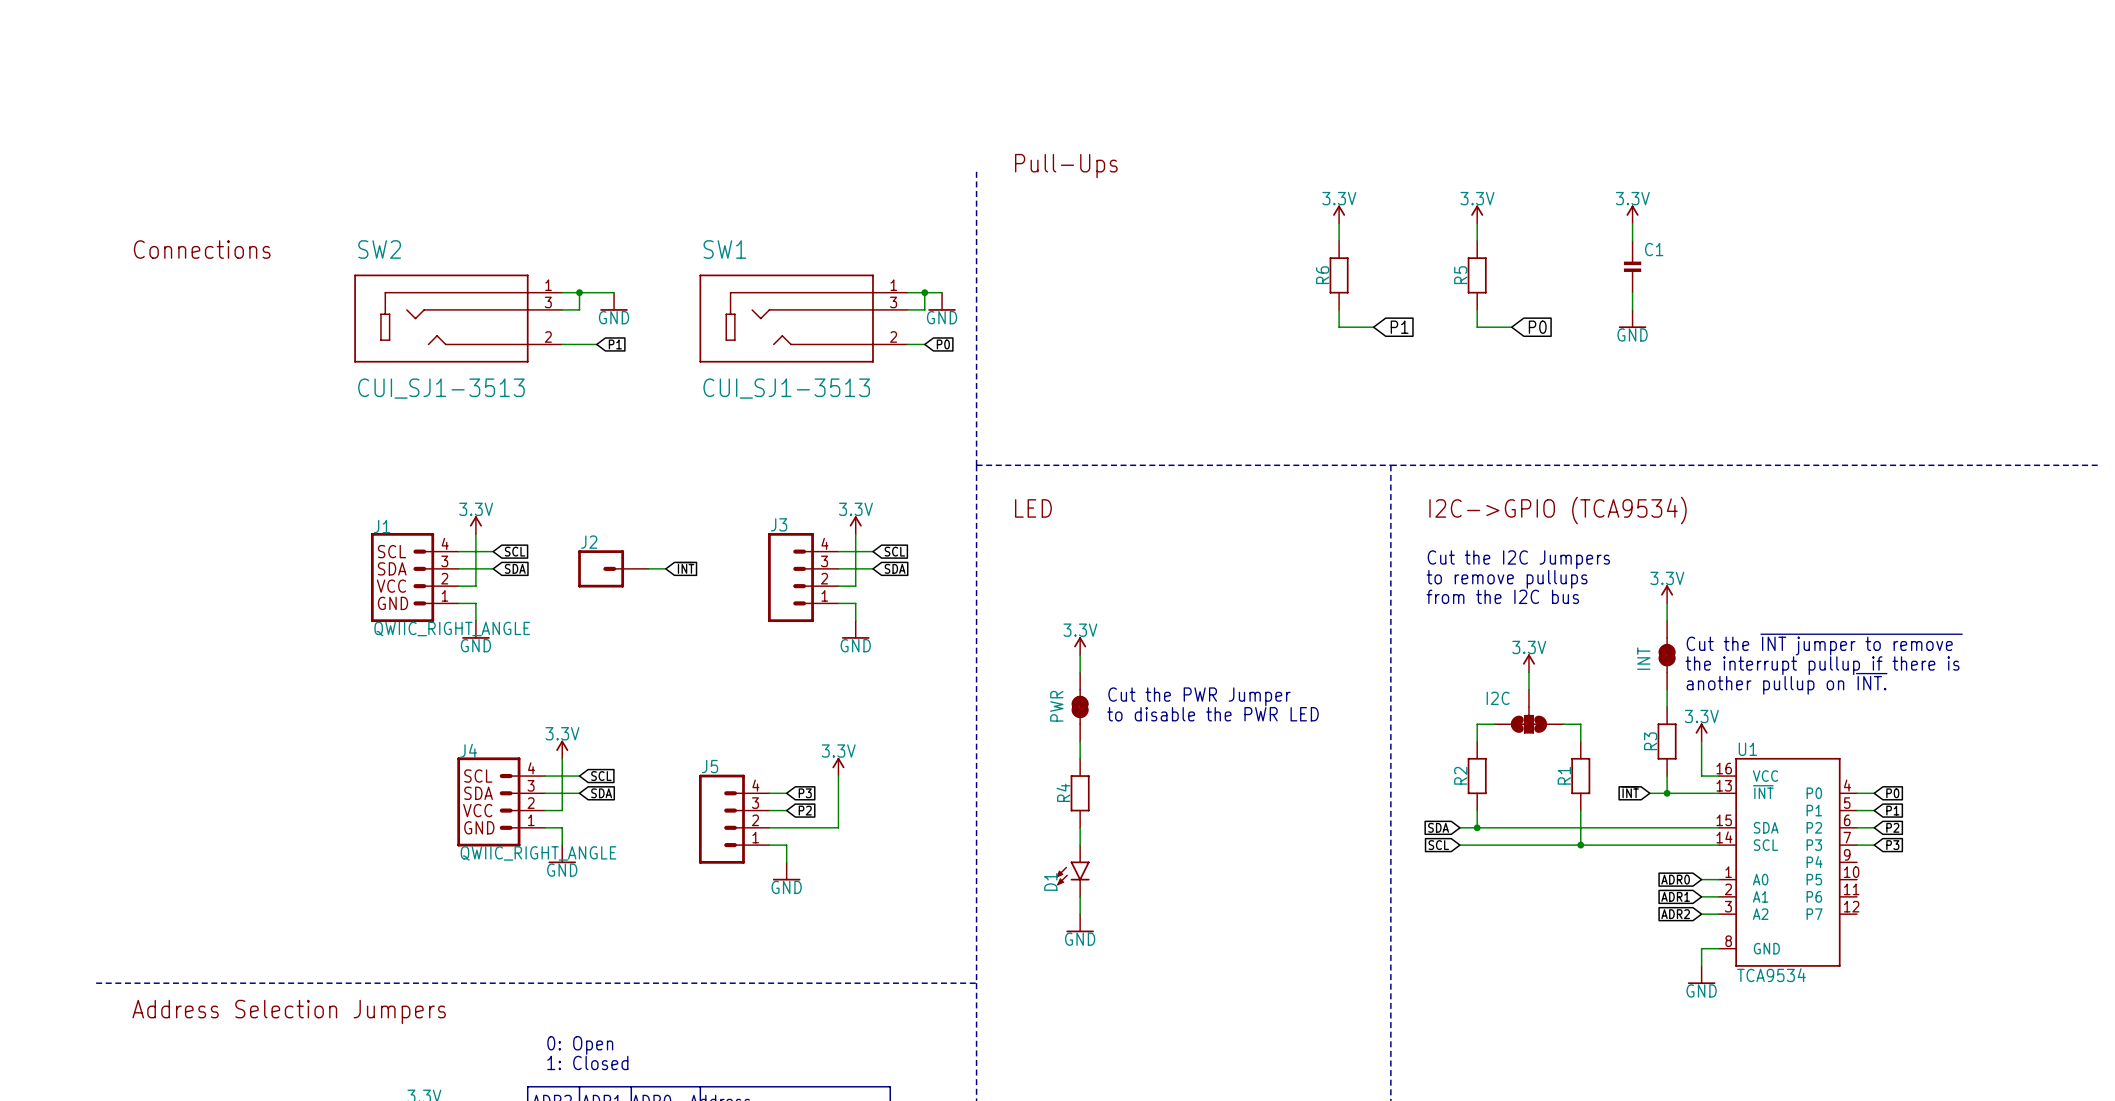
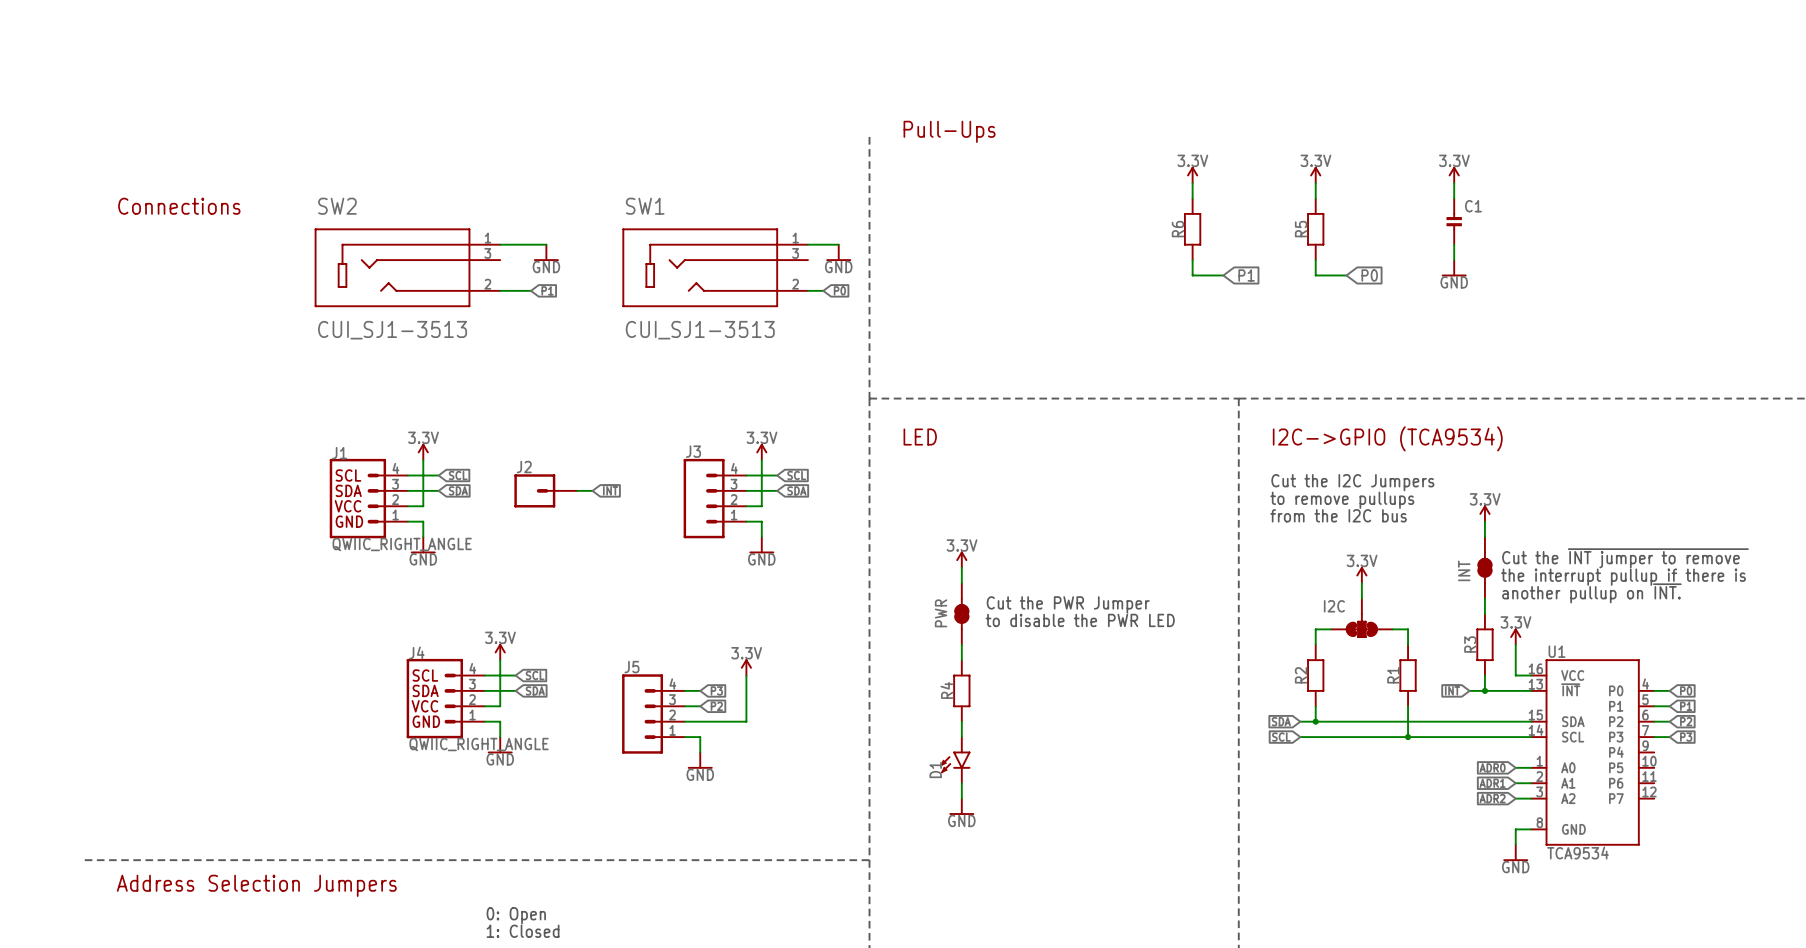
wire: (579, 292) (579, 309) (562, 309) -> none
junction: (579, 292) -> none
wire: (924, 292) (924, 309) (907, 309) -> none
junction: (924, 292) -> none

